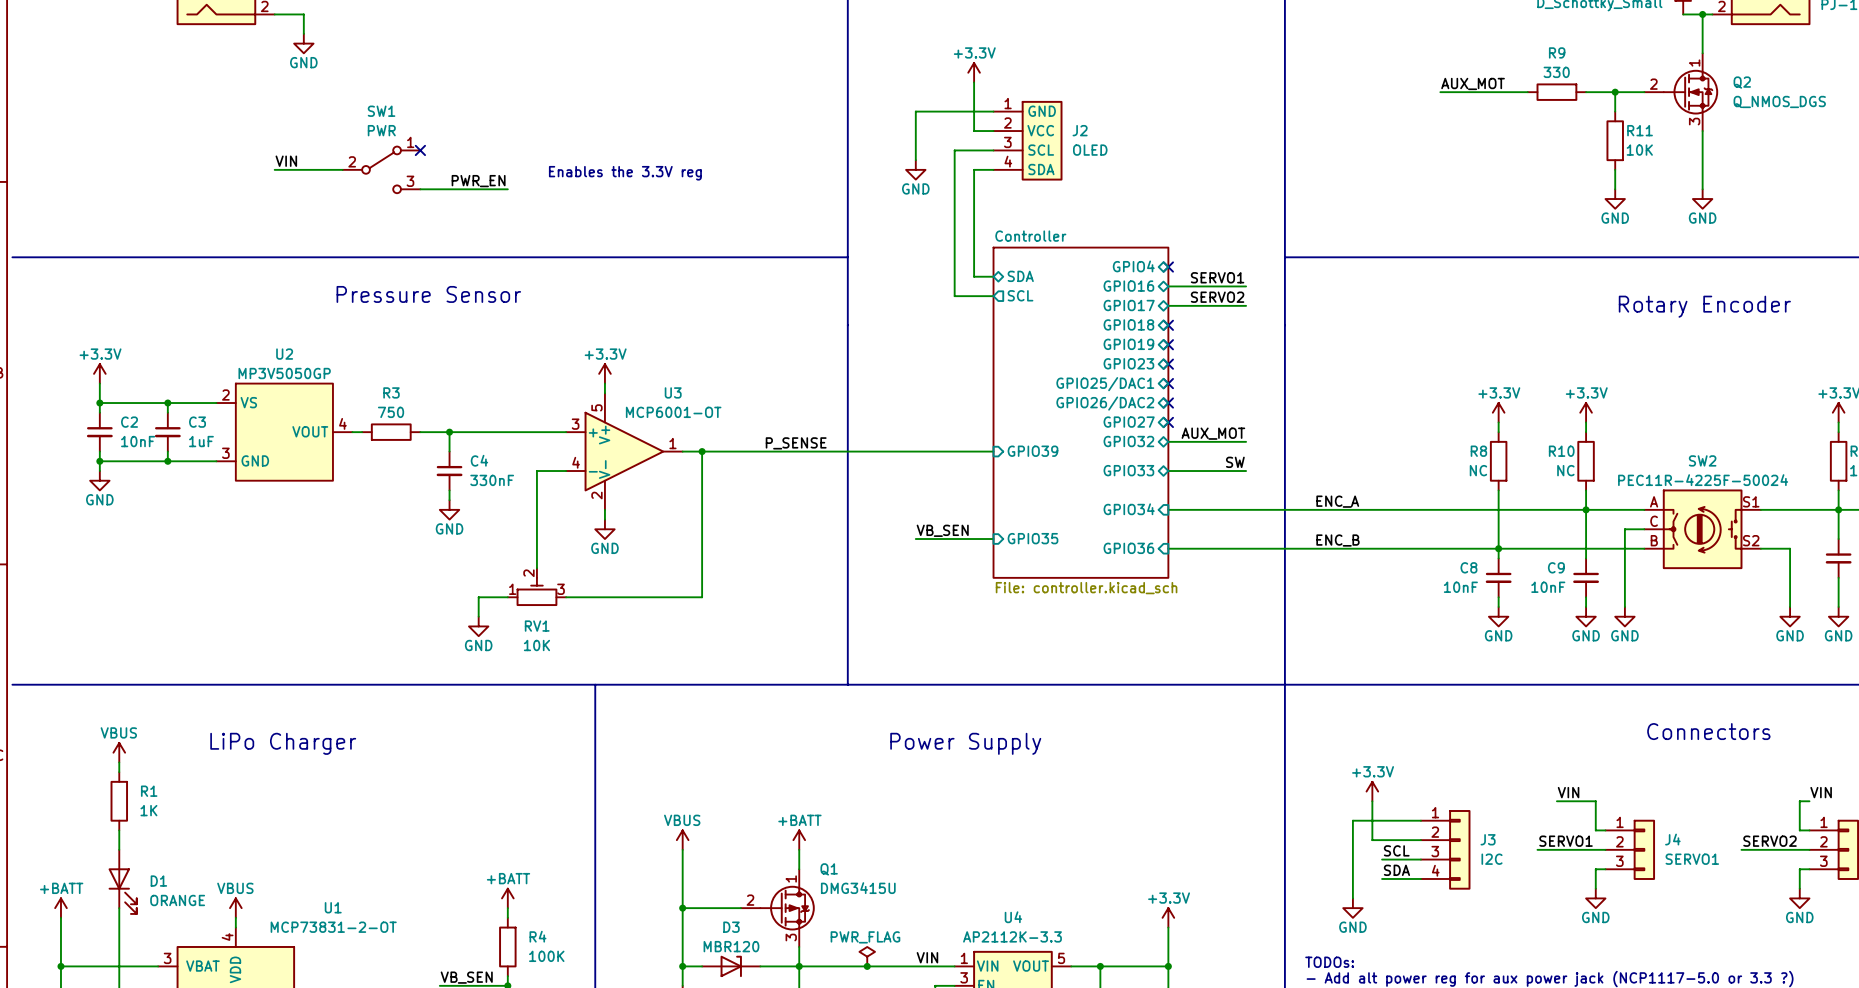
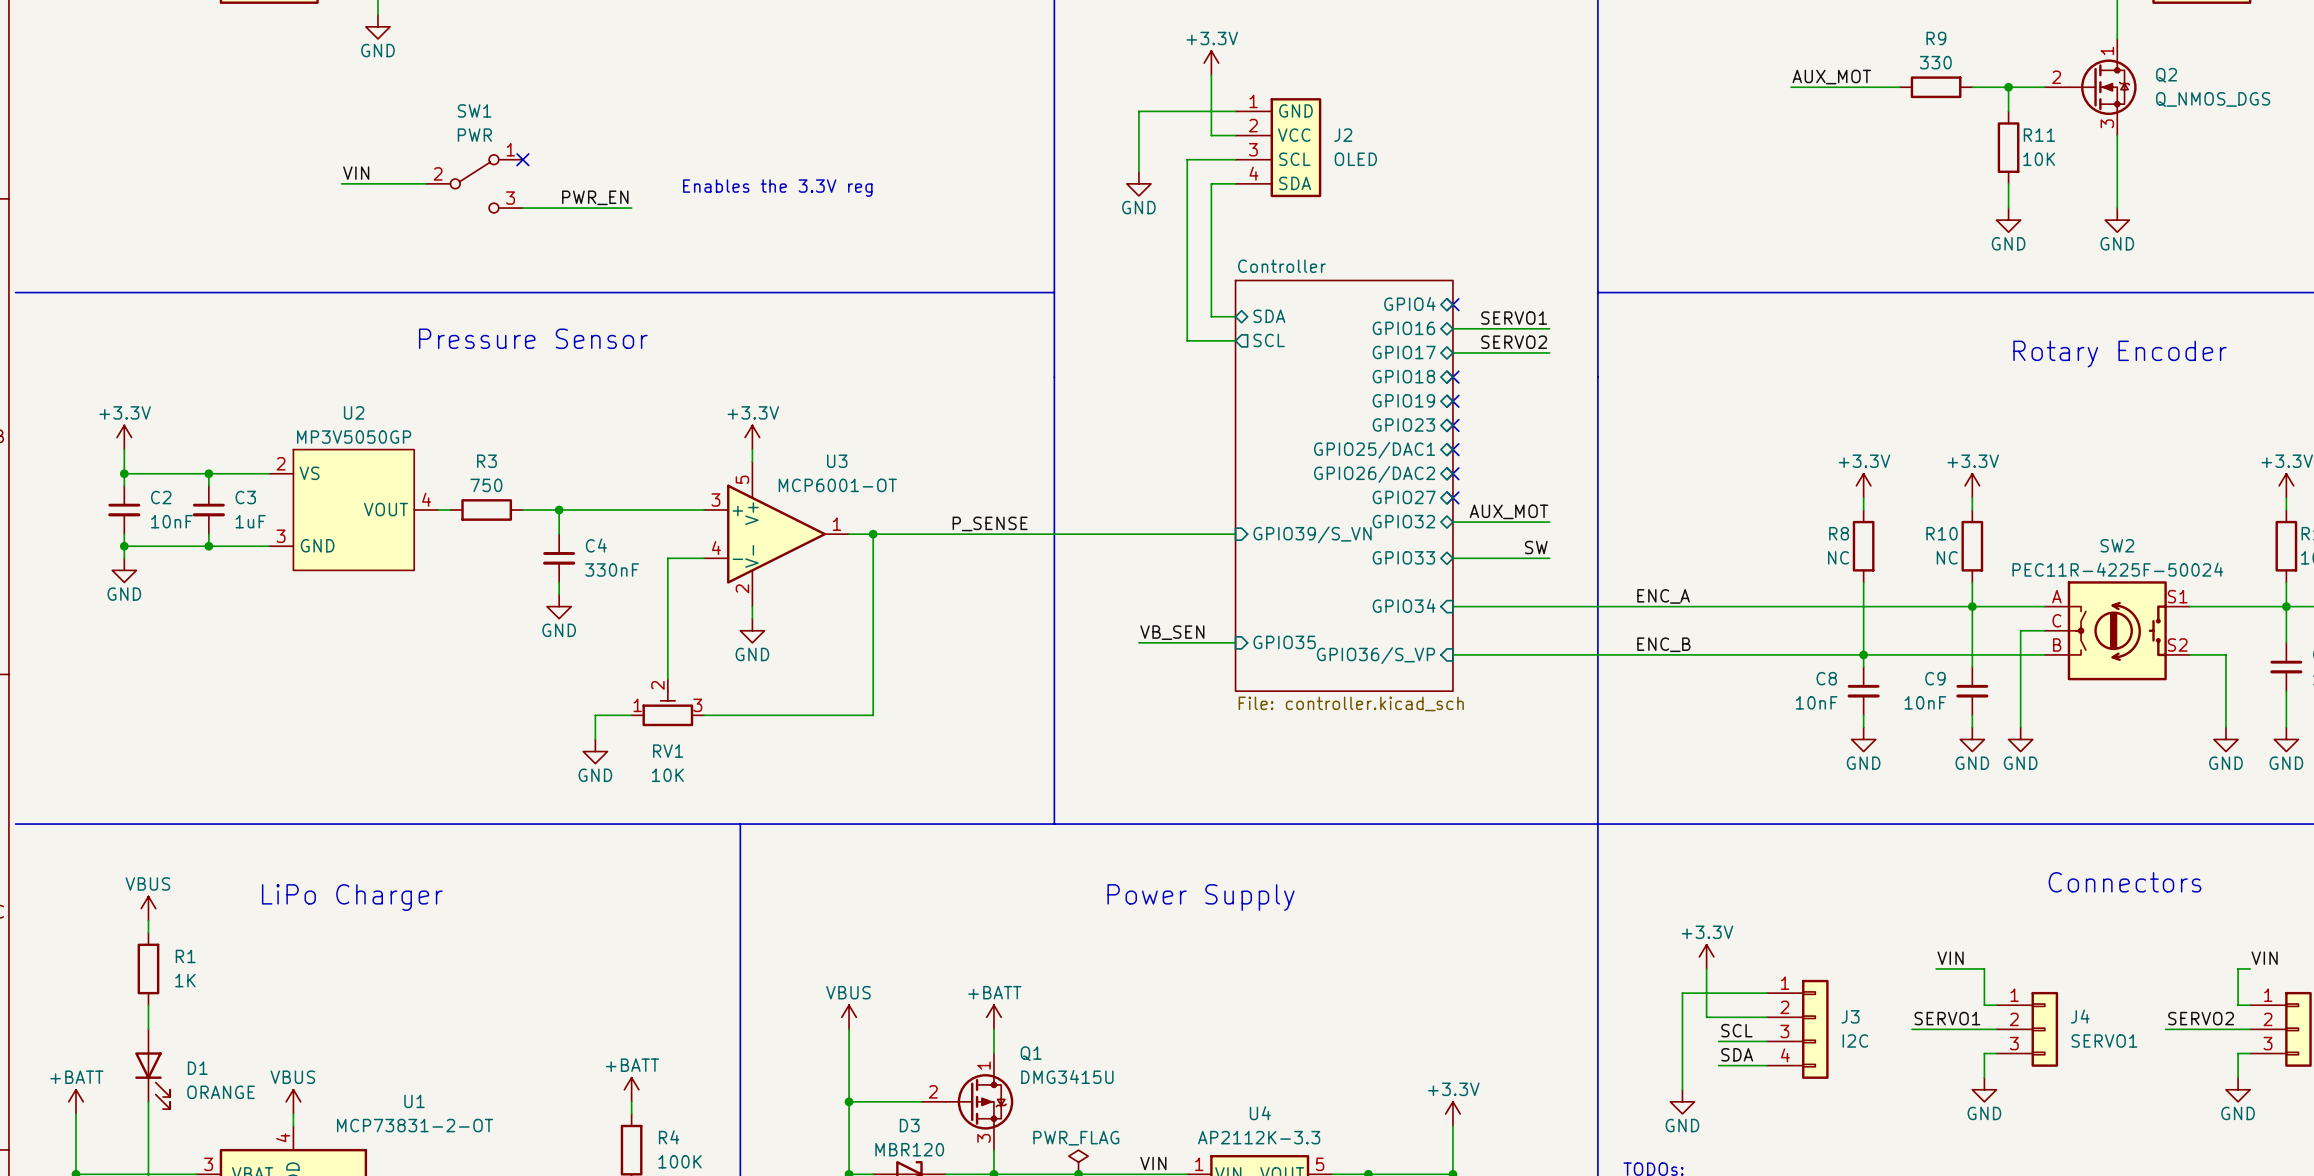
sheet pin: GPIO39 (1032, 451) -> GPIO39/S_VN (1312, 534)
sheet pin: GPIO36 (1128, 548) -> GPIO36/S_VP (1375, 655)

